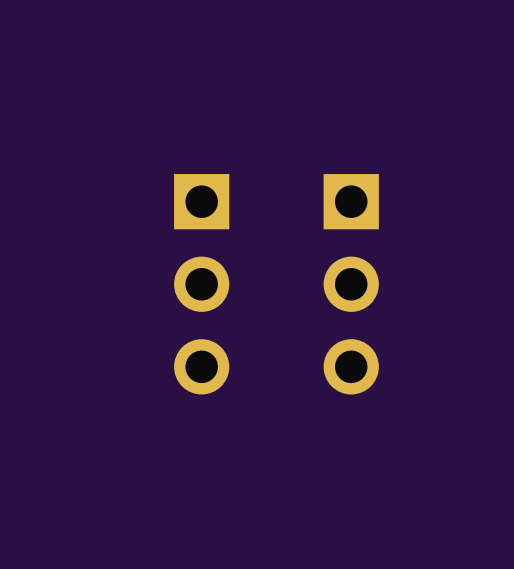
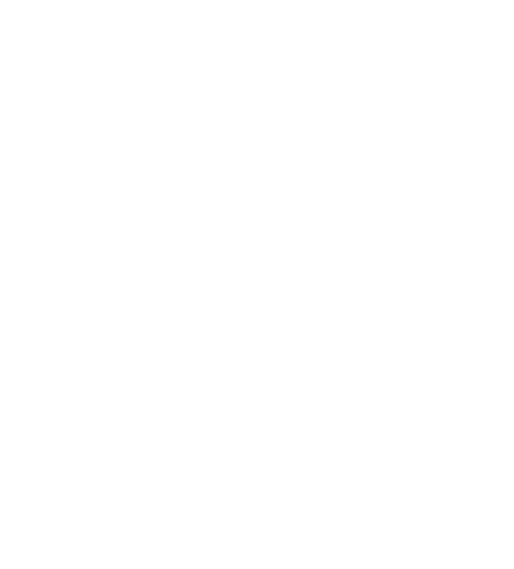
part: (201, 284) -> none
part: (351, 284) -> none

